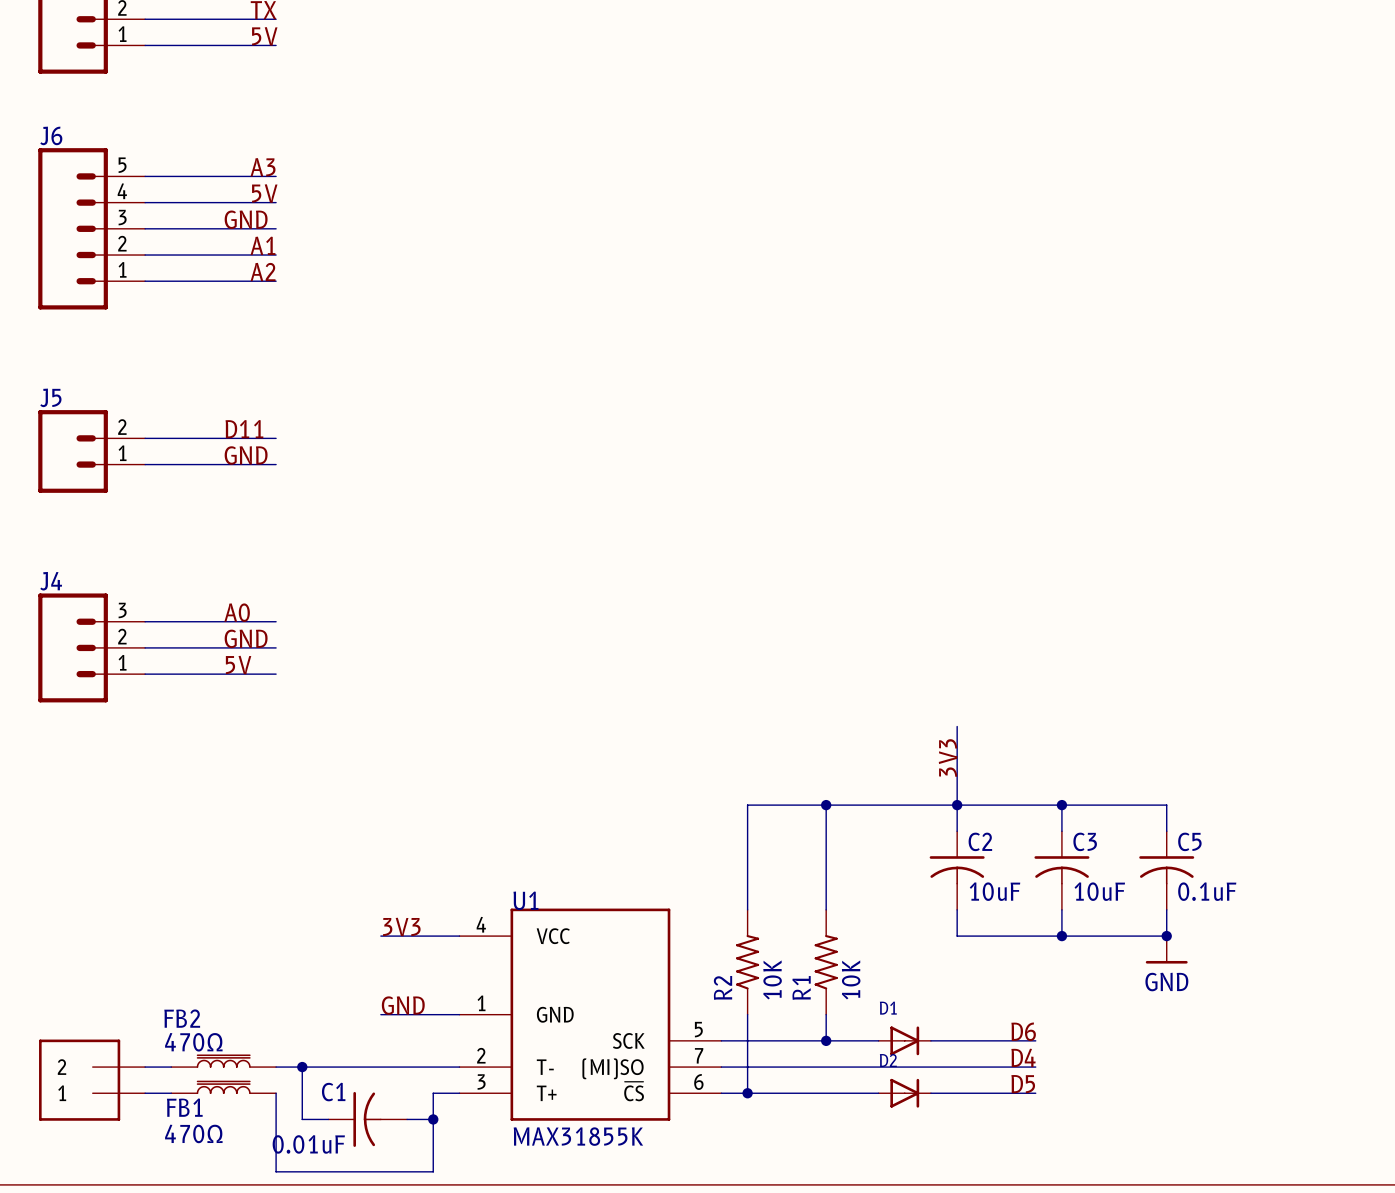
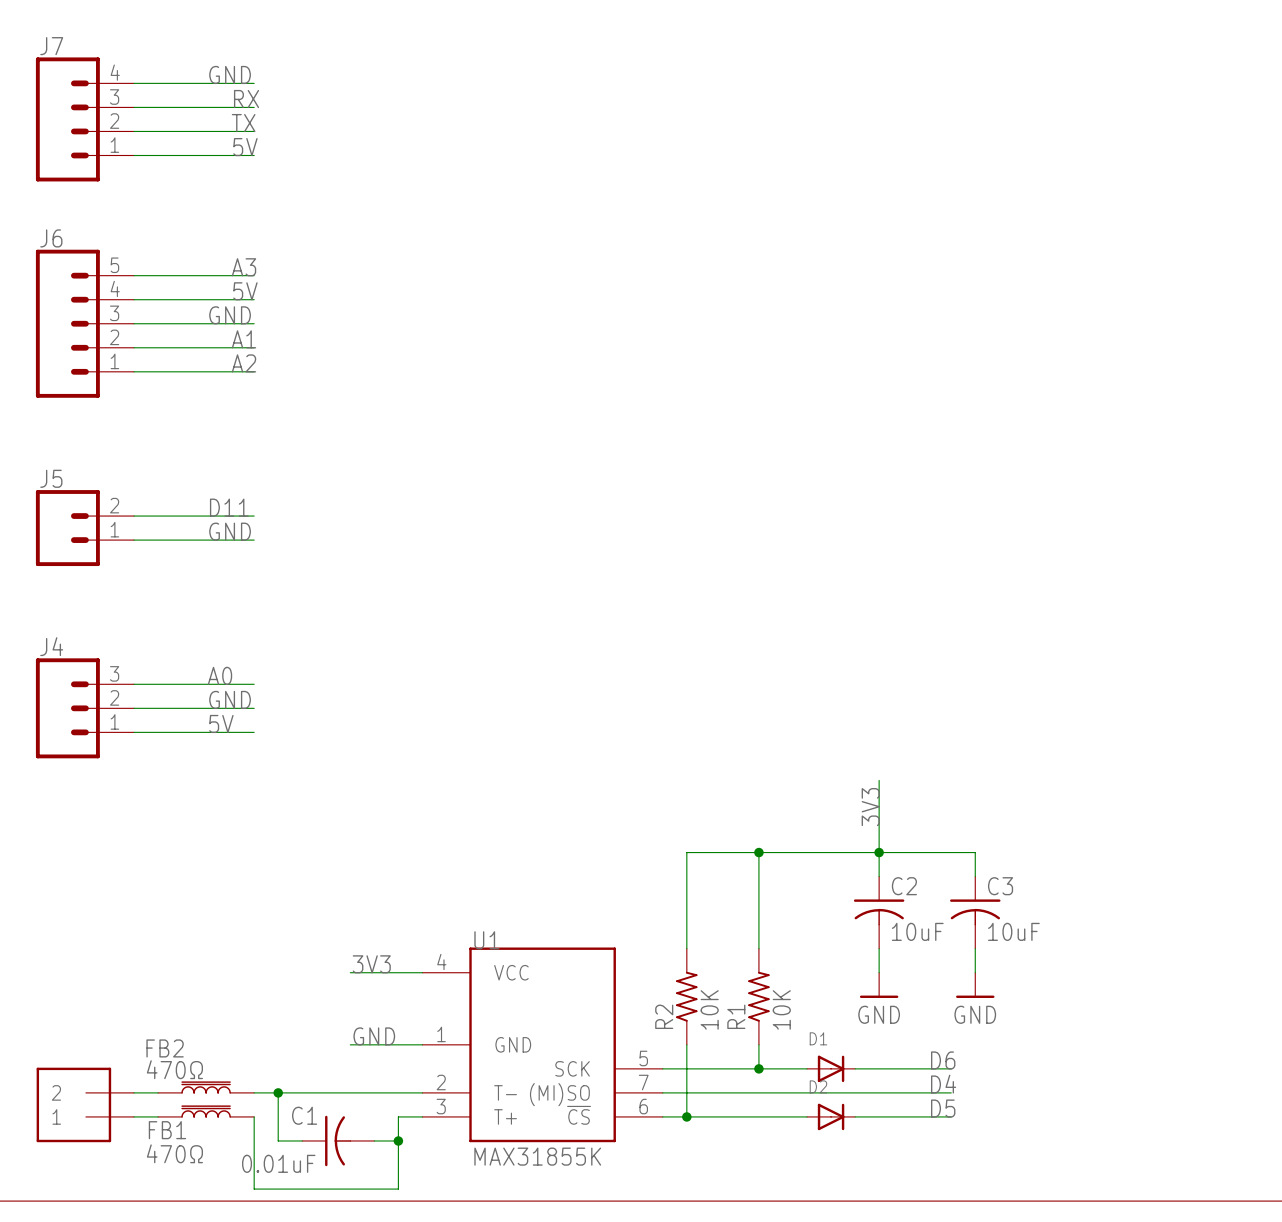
wire: (1061, 805) (1166, 805) (1166, 831) -> none
junction: (1061, 805) -> none
C5: 0.1uF (1166, 870) -> none
wire: (1166, 909) (1166, 936) (957, 936) -> none
junction: (1061, 936) -> none
junction: (1166, 936) -> none
power symbol: none -> GND (879, 985)
power symbol: none -> GND (975, 985)
power symbol: GND (1166, 949) -> none

